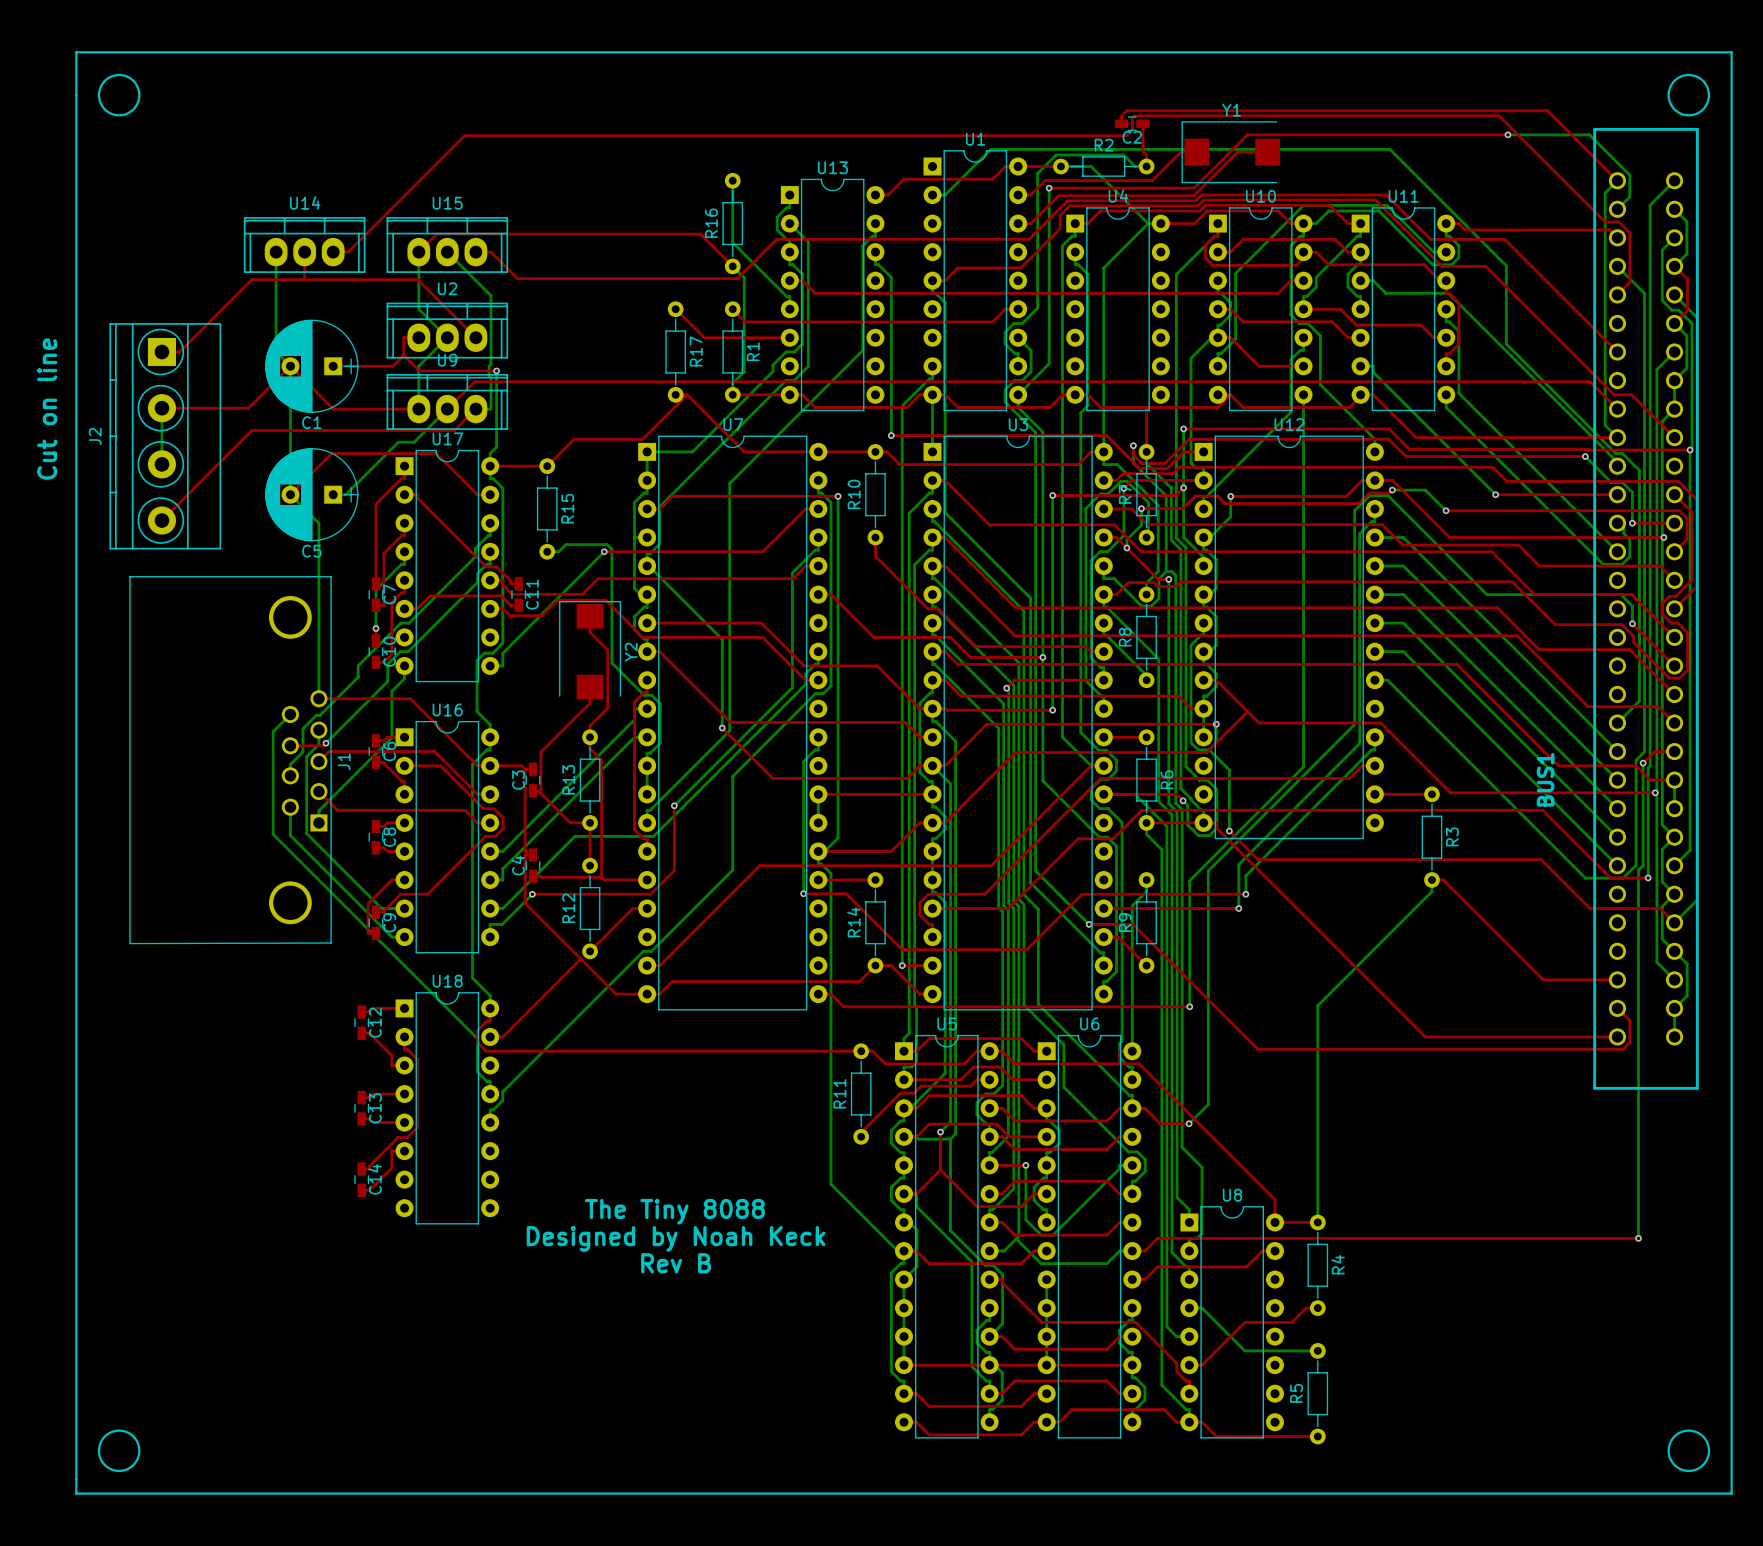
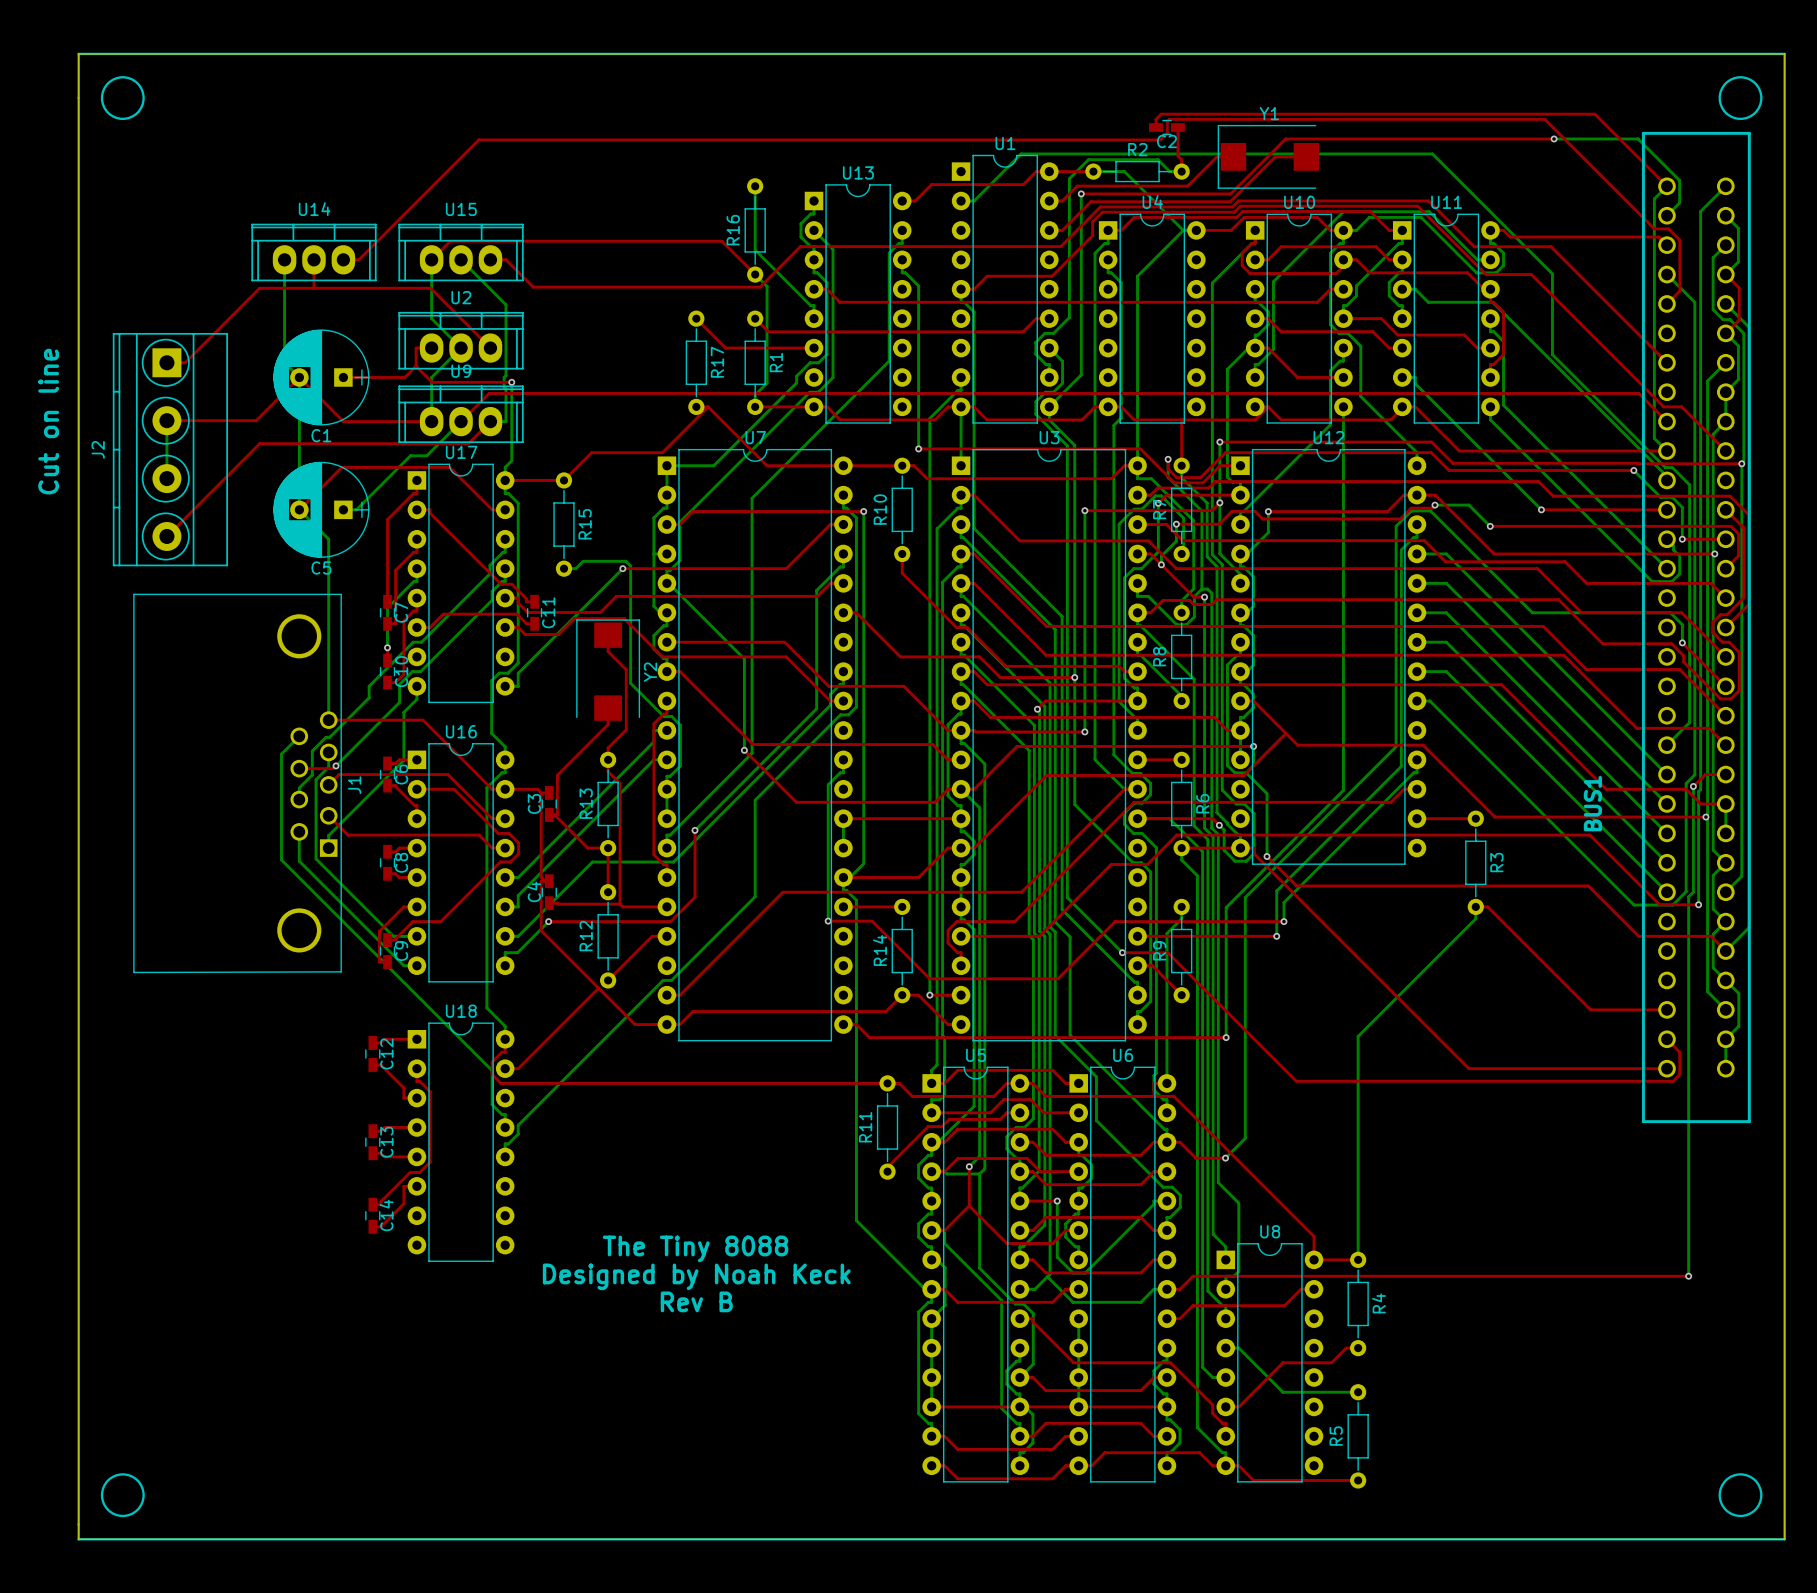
board edge: none -> (78, 53) (78, 1539) (1784, 1539) (1784, 53) (78, 53)

